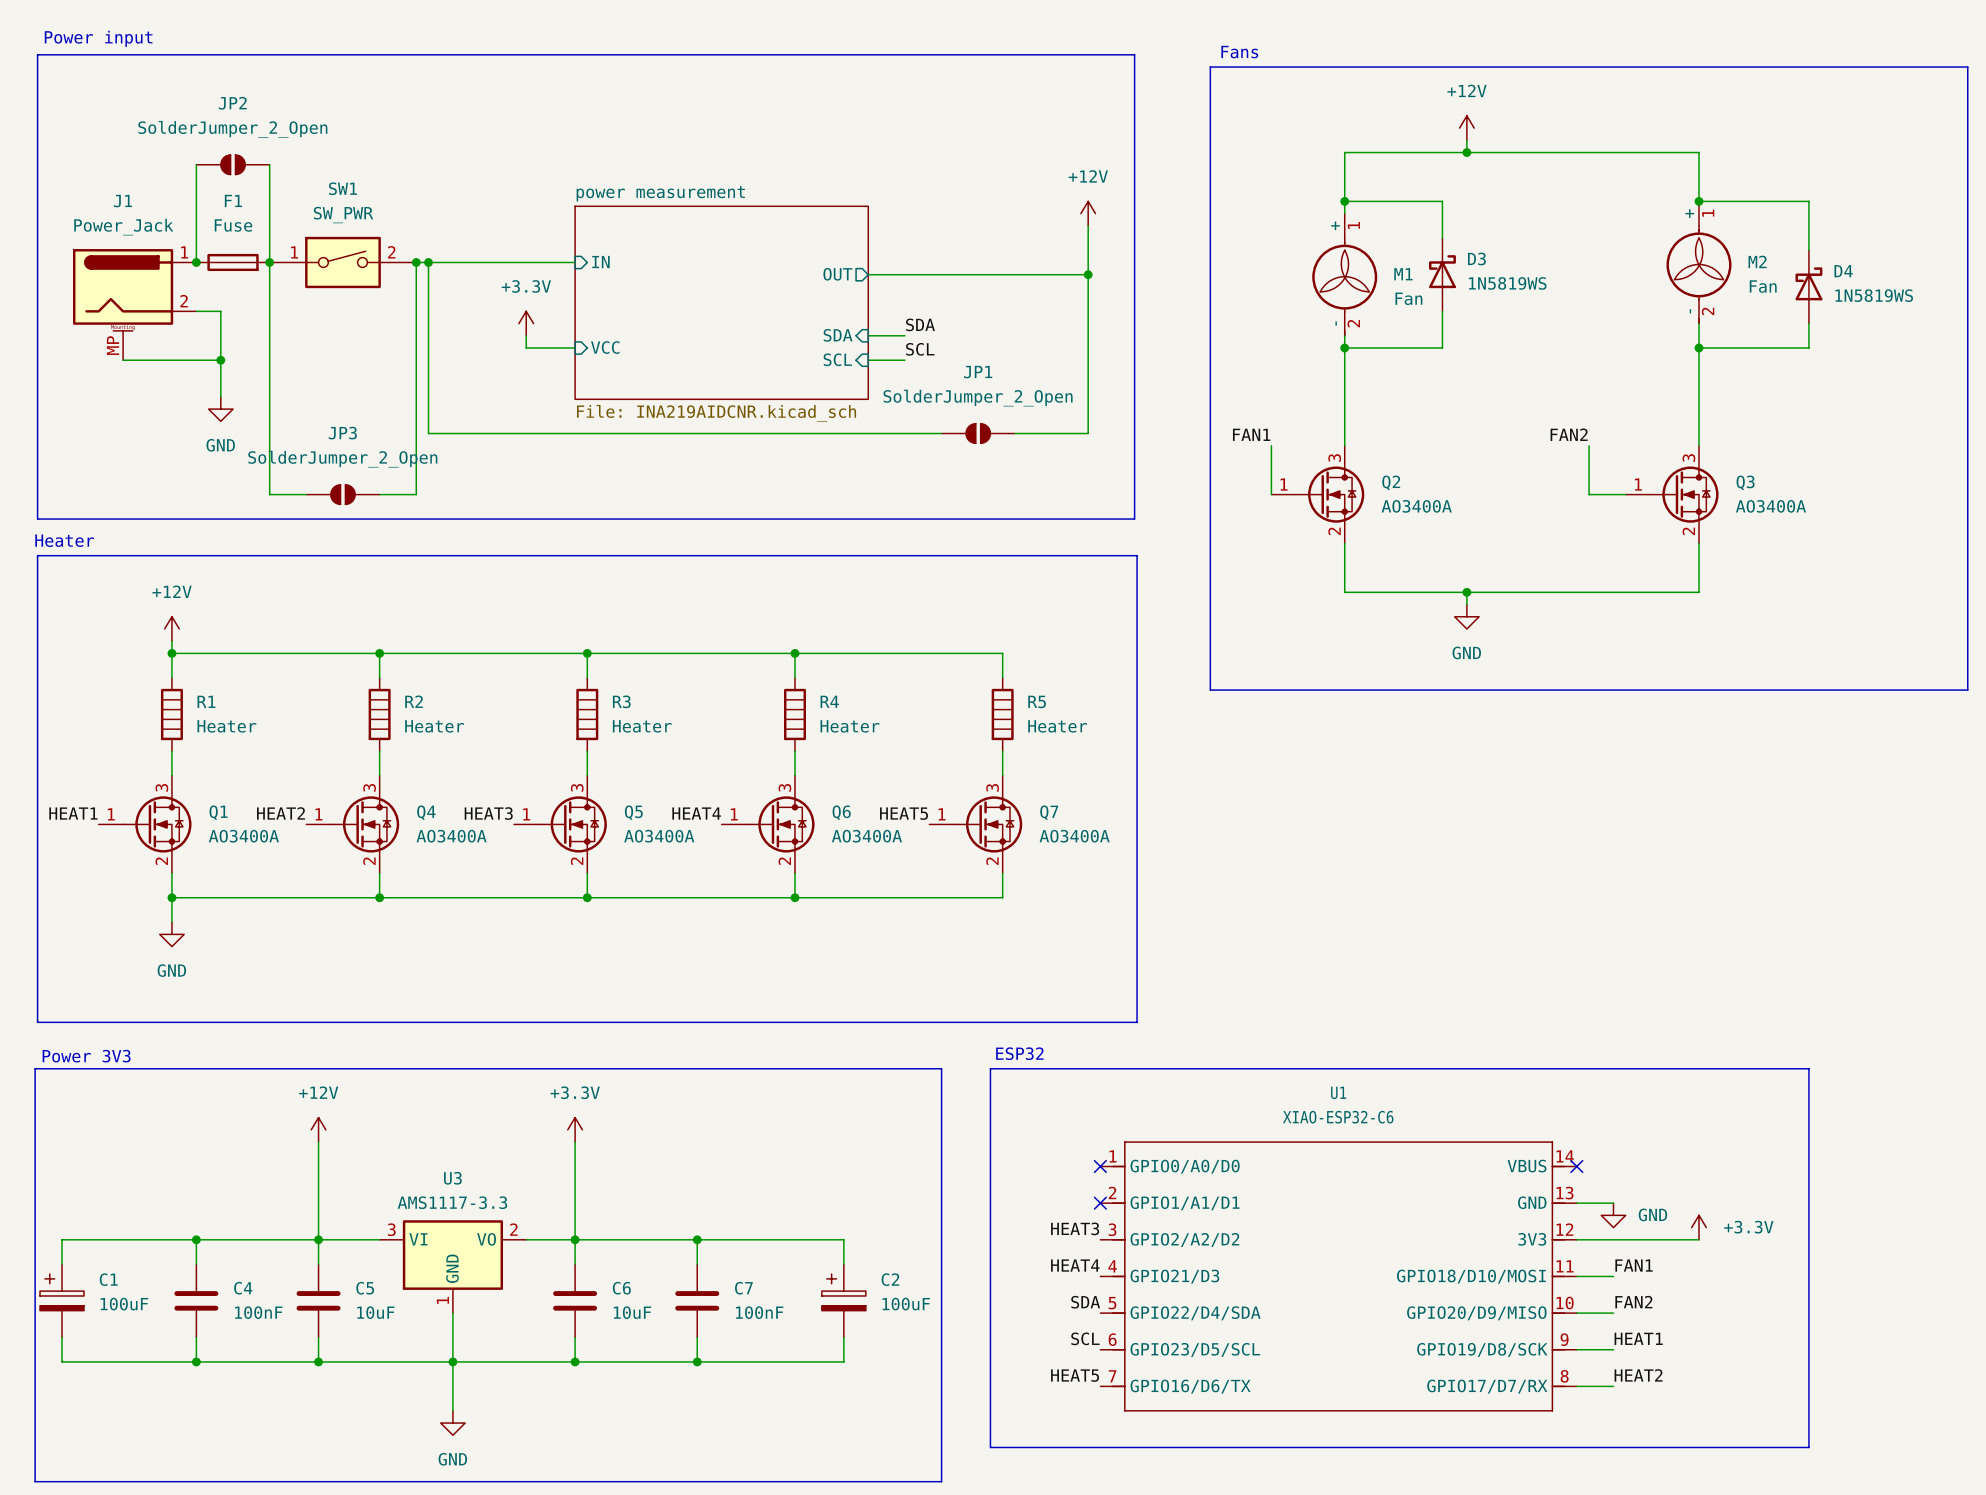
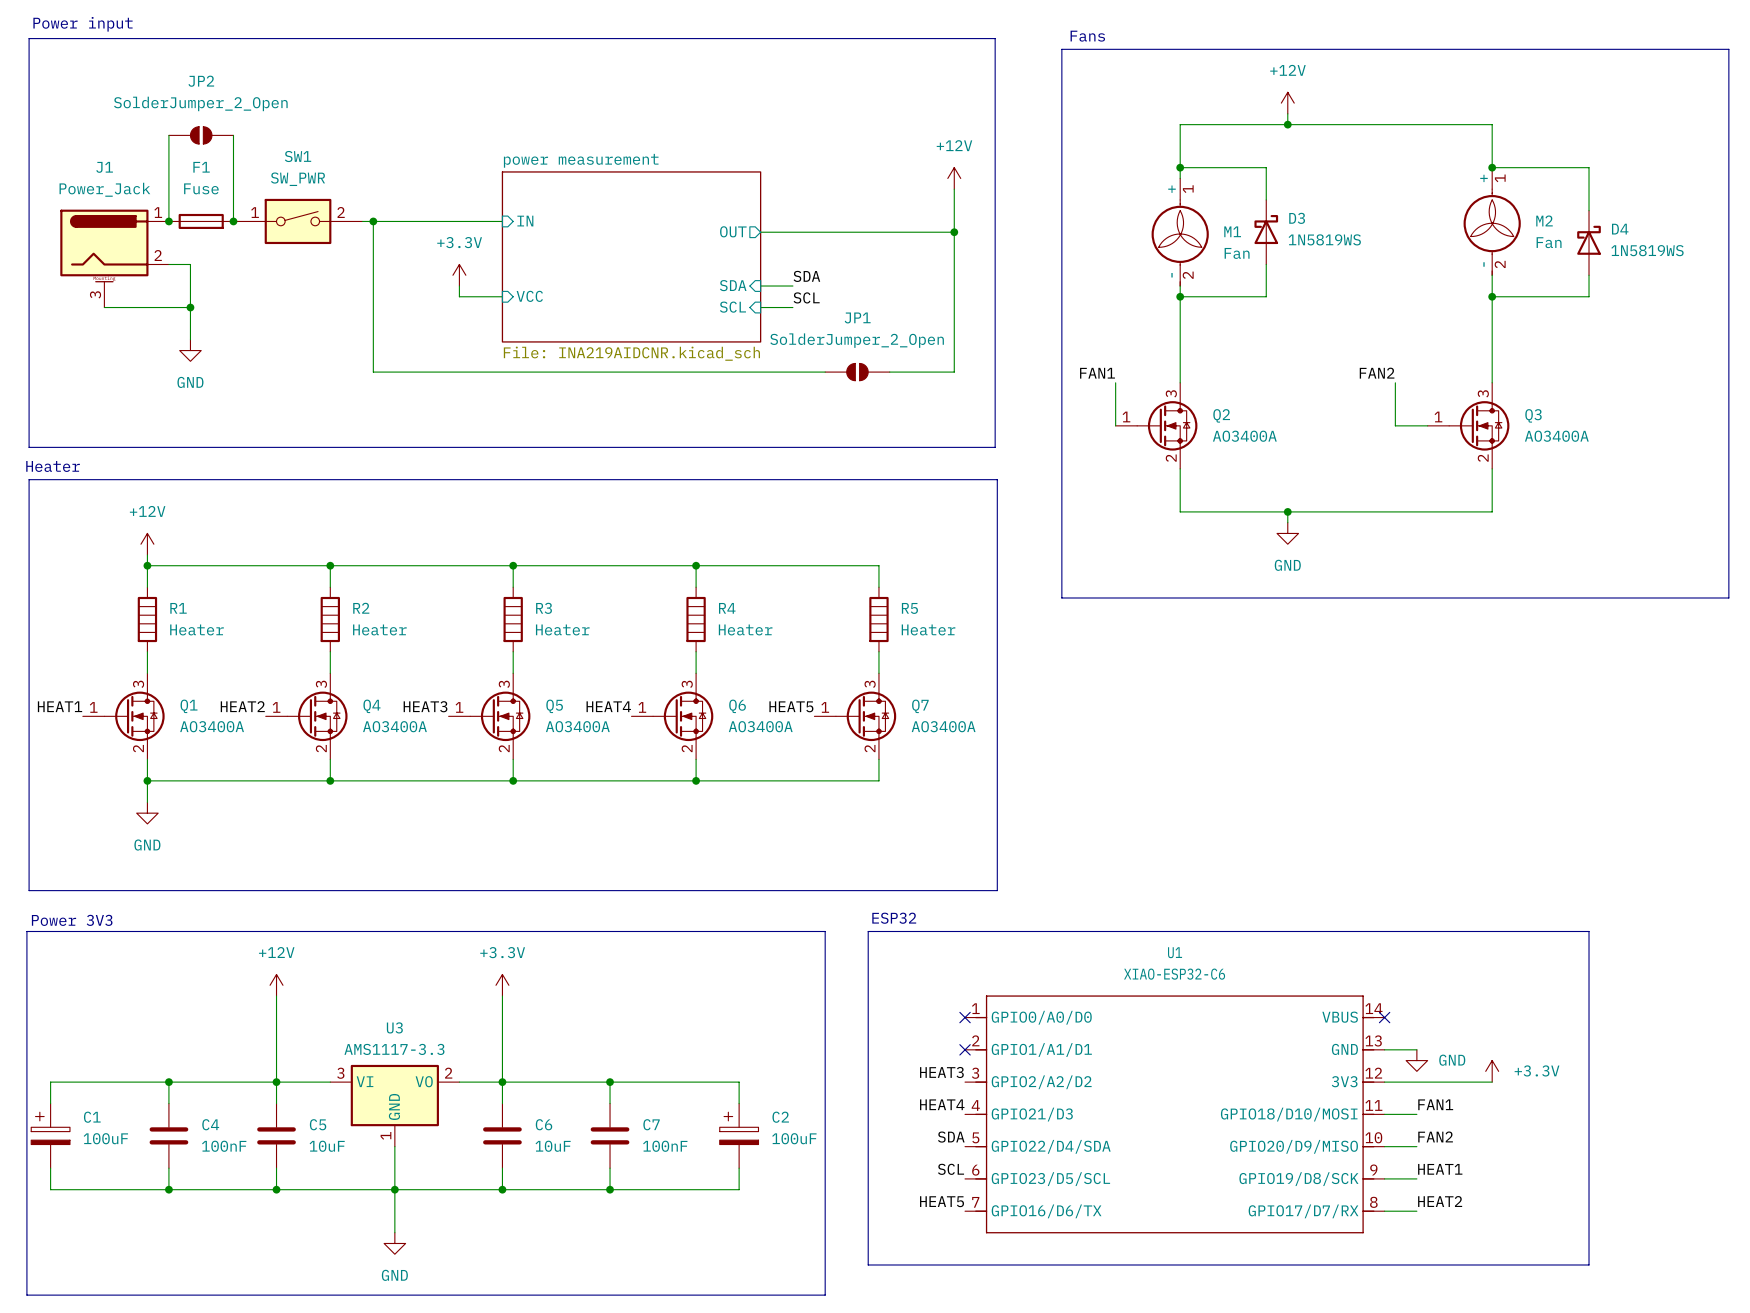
wire: (269, 262) (269, 494) (306, 494) -> none
wire: (416, 262) (416, 494) (379, 494) -> none
junction: (416, 262) -> none
J1 pin number: MP (113, 345) -> 3 (95, 294)
JP3: SolderJumper_2_Open (342, 494) -> none

